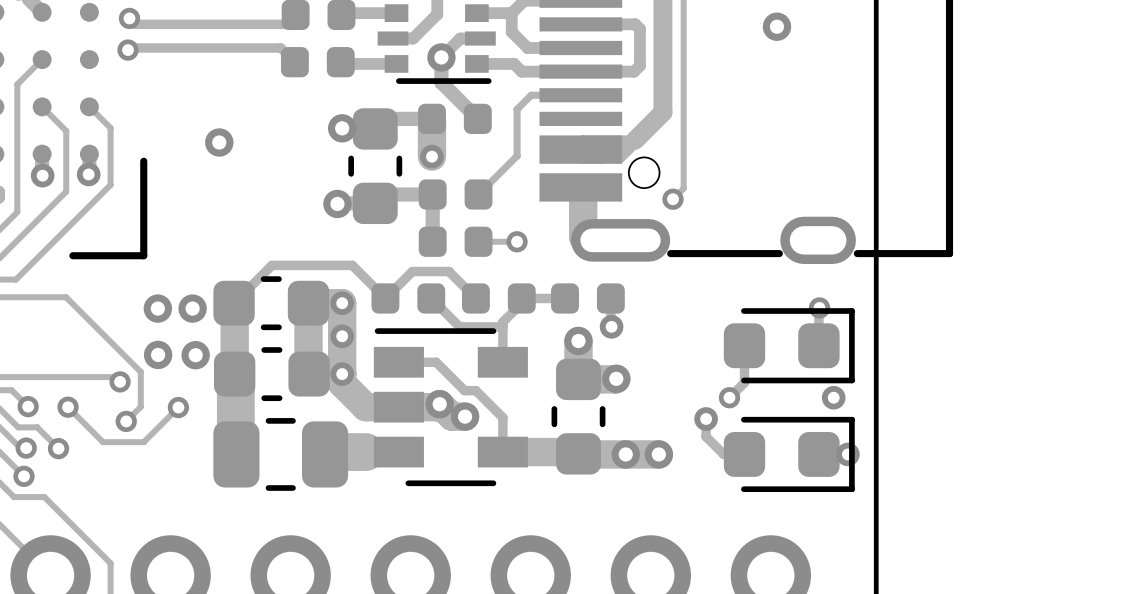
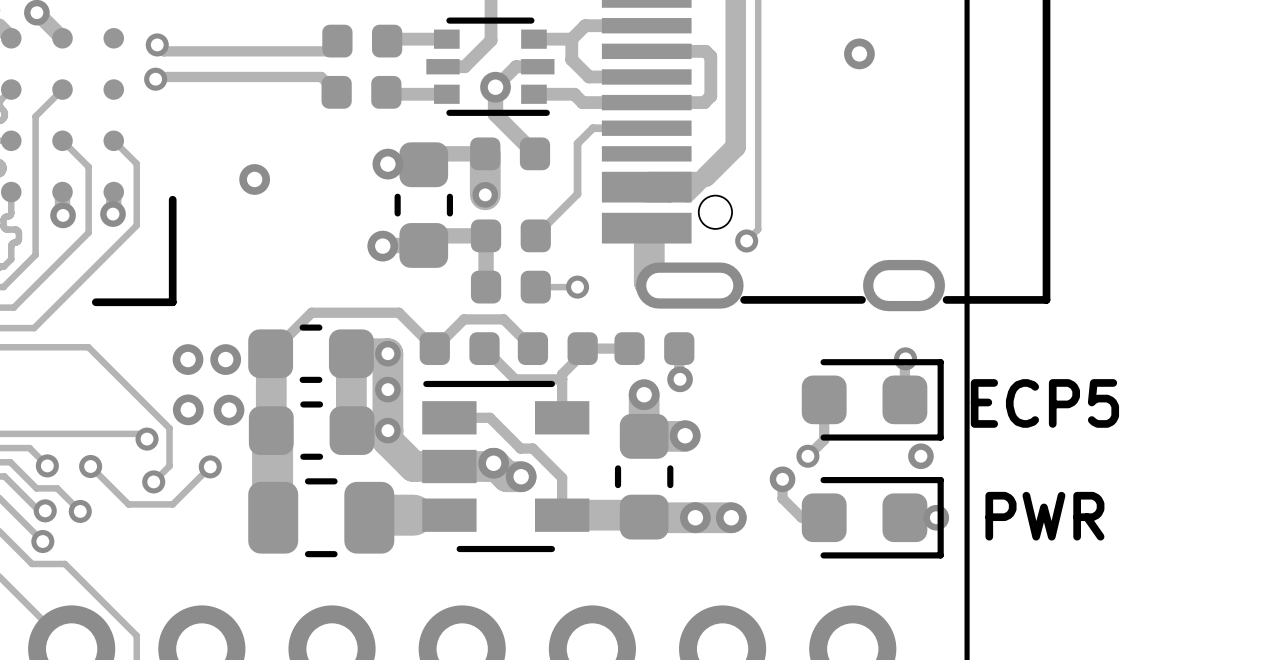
text: none -> ECP5 (1044, 403)
text: none -> PWR (1044, 516)

